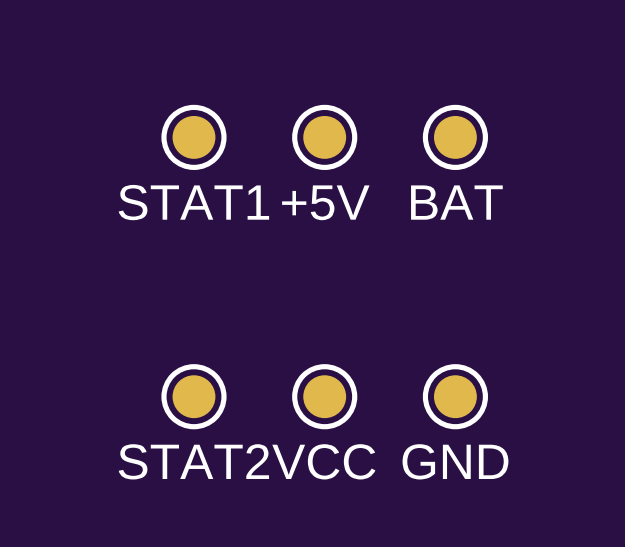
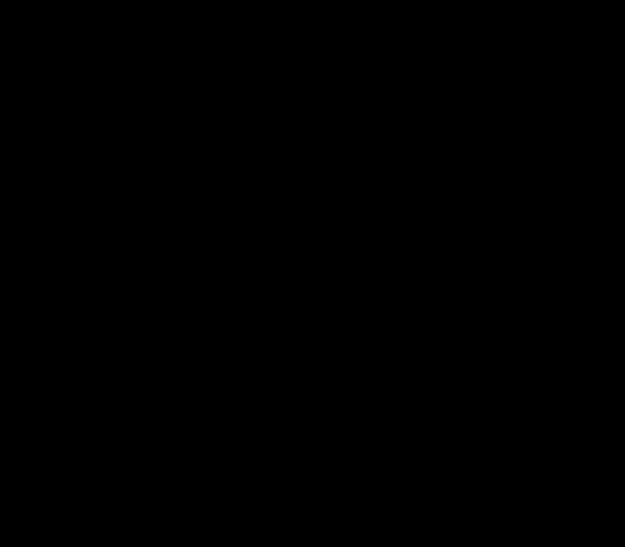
part: STAT1 (193, 137) -> none
part: +5V (324, 137) -> none
part: BAT (455, 137) -> none
part: STAT2 (193, 396) -> none
part: VCC (324, 396) -> none
part: GND (455, 396) -> none

